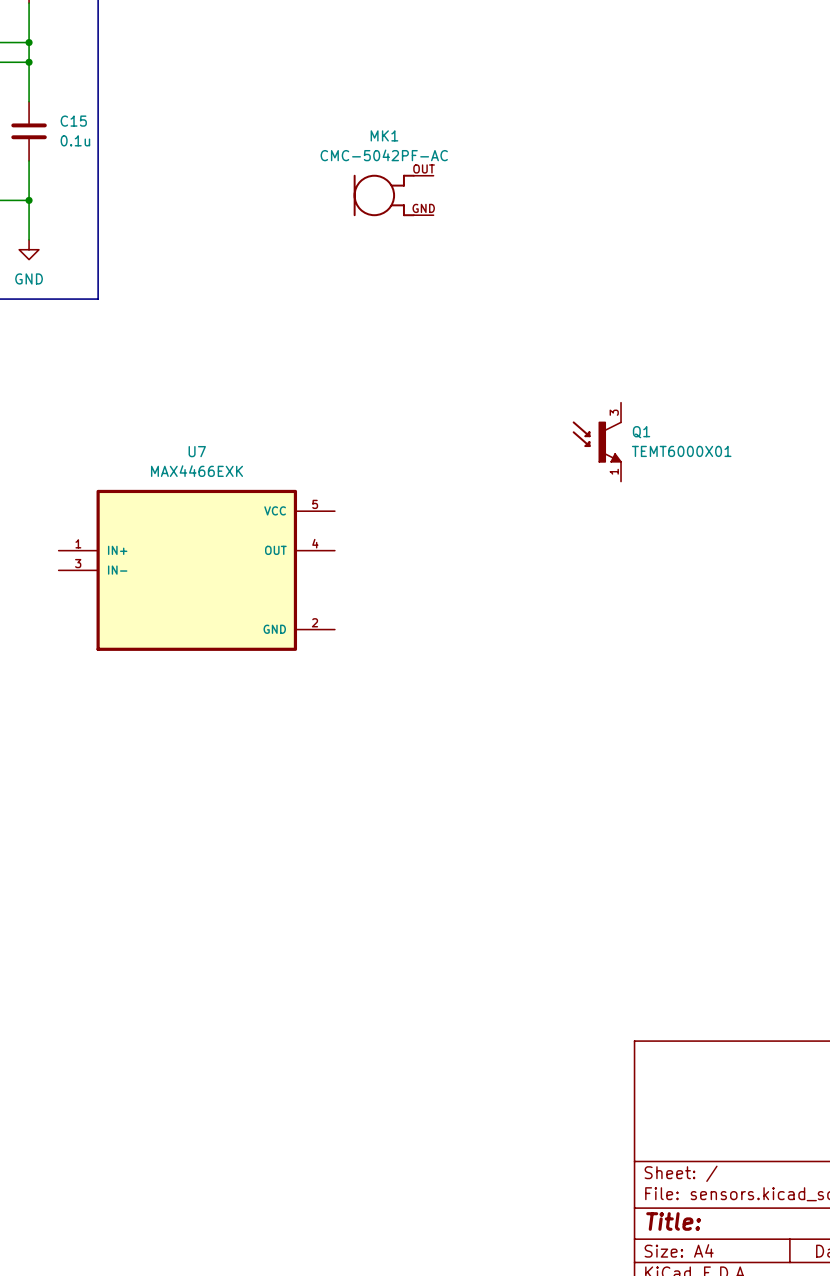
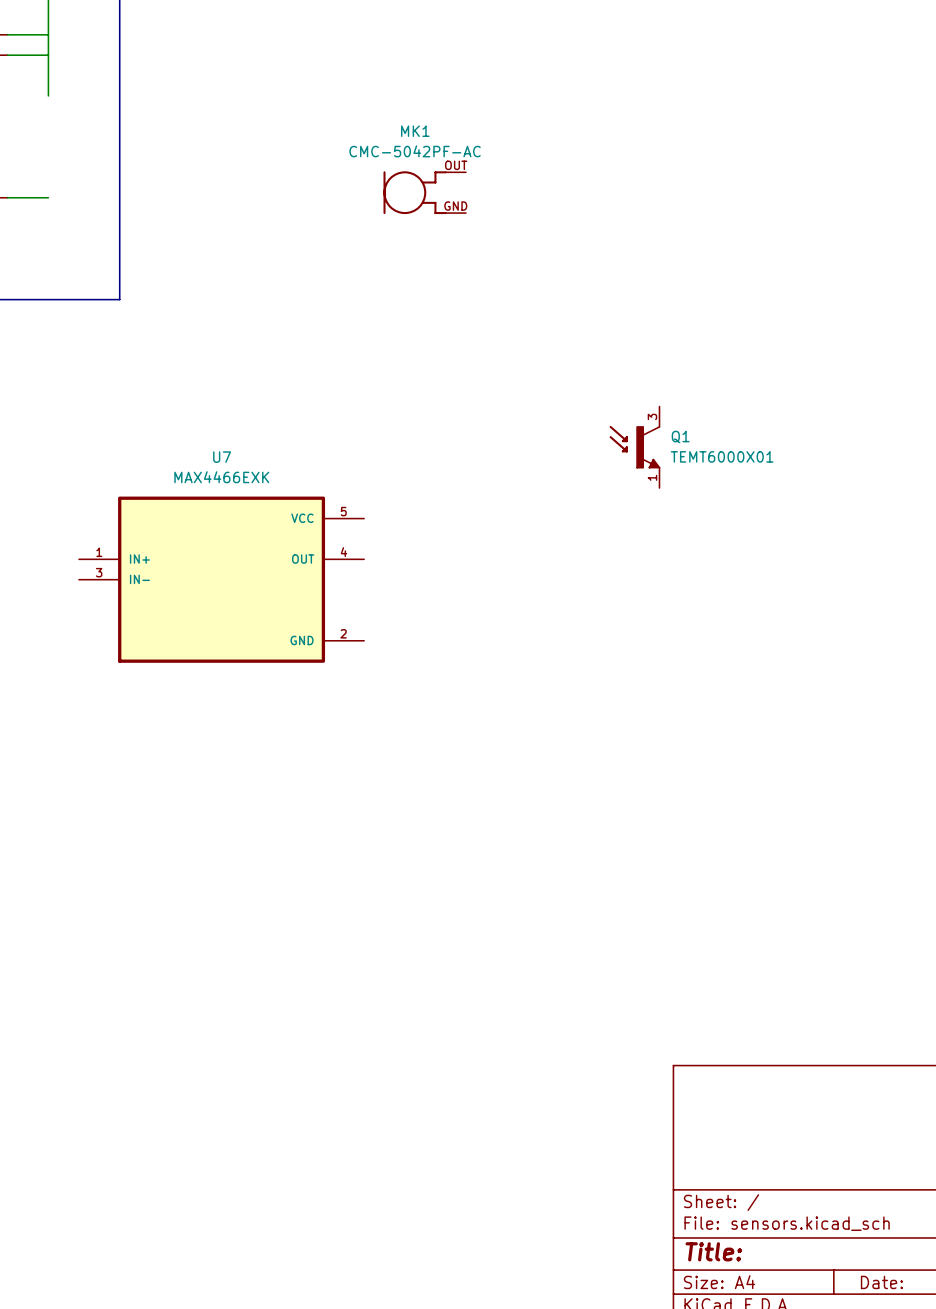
junction: (29, 42) -> none
junction: (29, 62) -> none
C15: 0.1u (29, 131) -> none
wire: (29, 160) (29, 239) -> none
junction: (29, 200) -> none
power symbol: GND (29, 249) -> none

